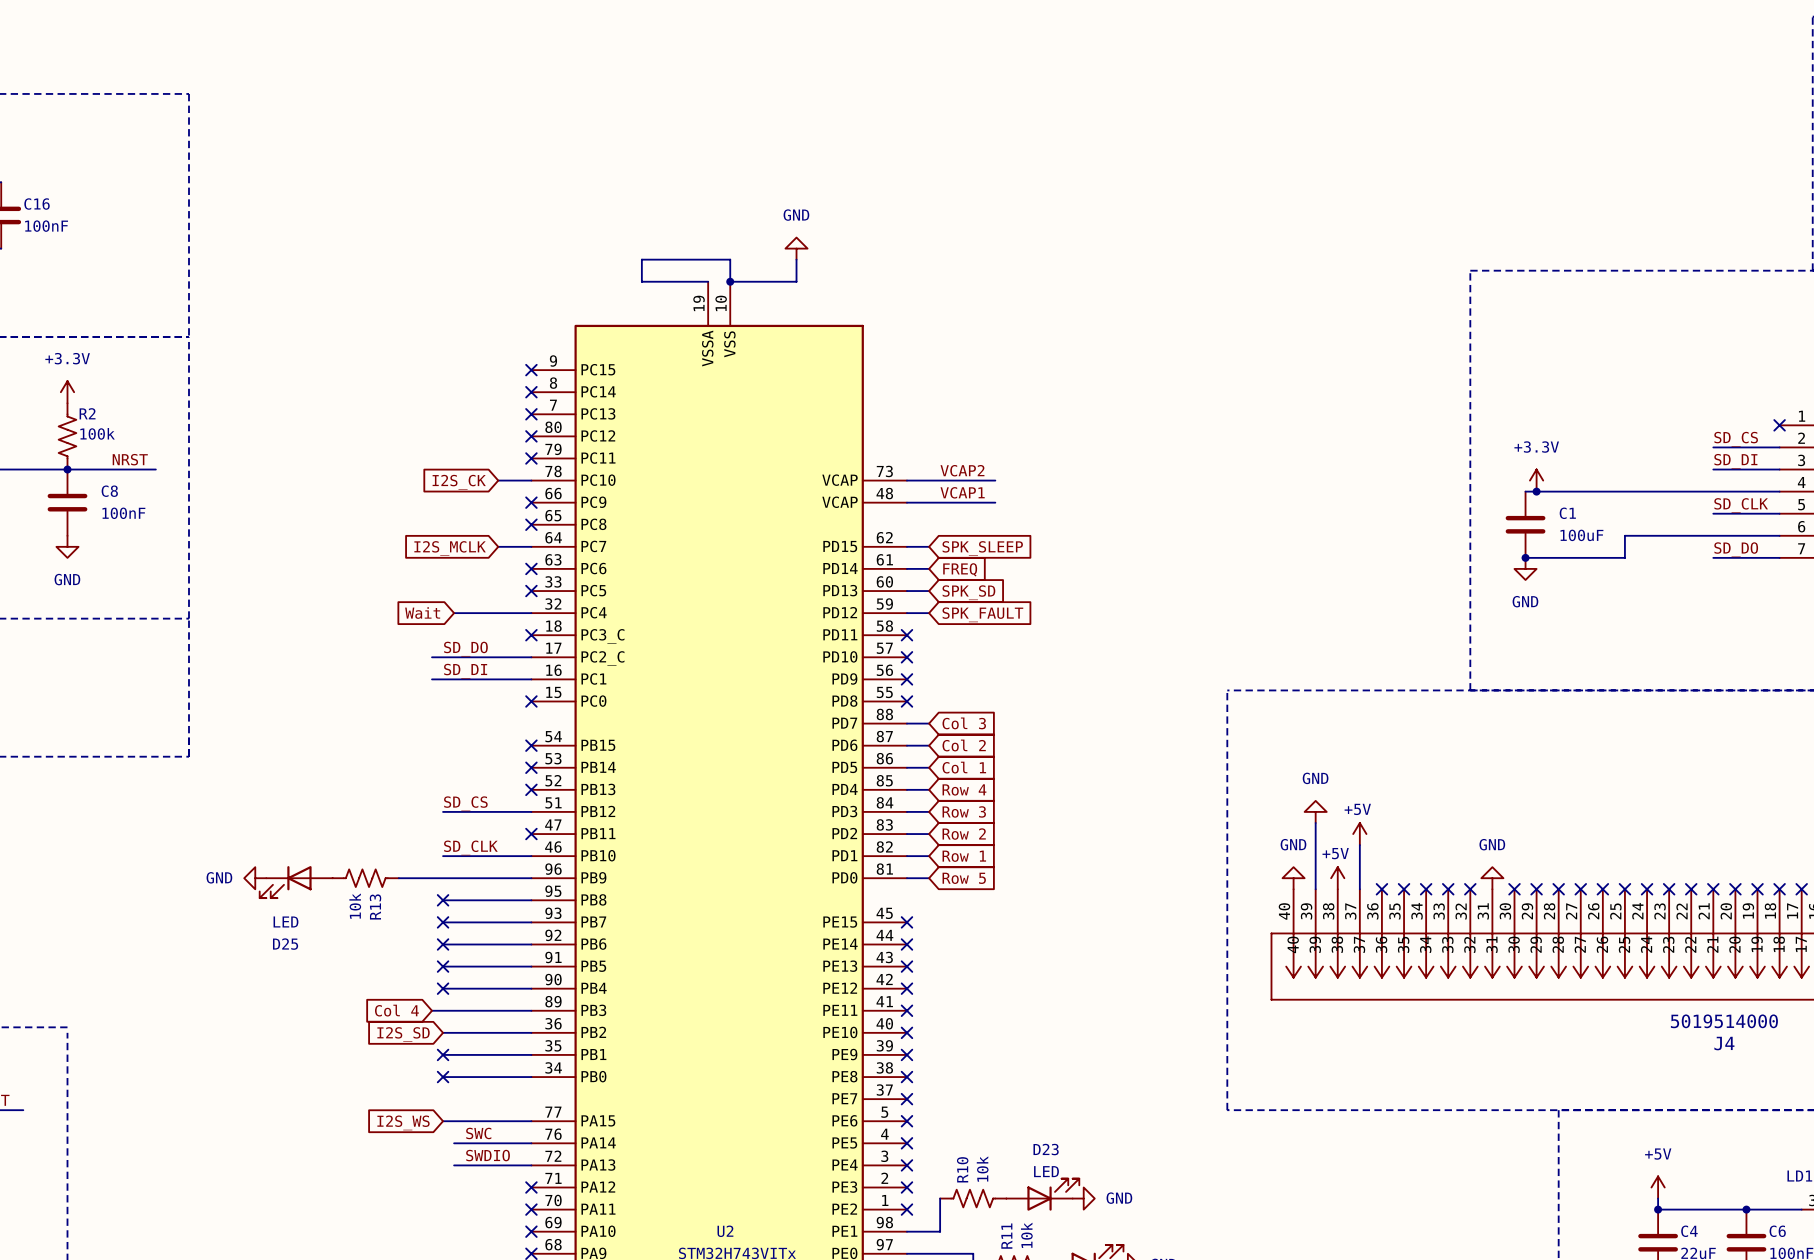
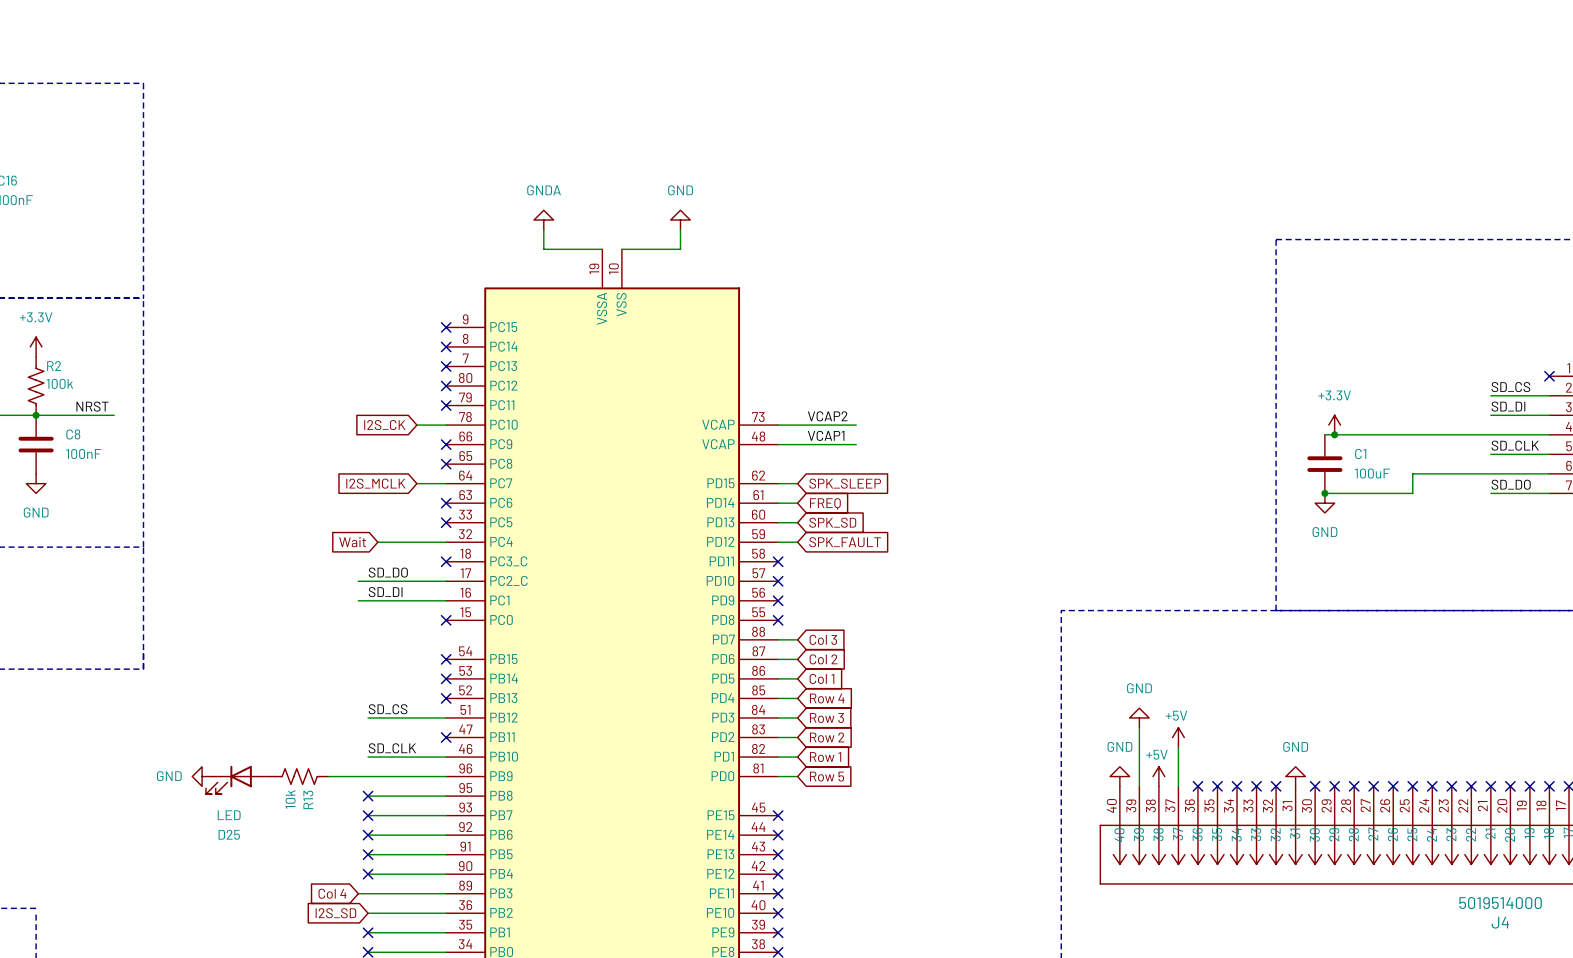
power symbol: none -> GNDA (543, 220)
wire: (641, 259) (730, 259) (730, 281) -> none
junction: (730, 281) -> none

